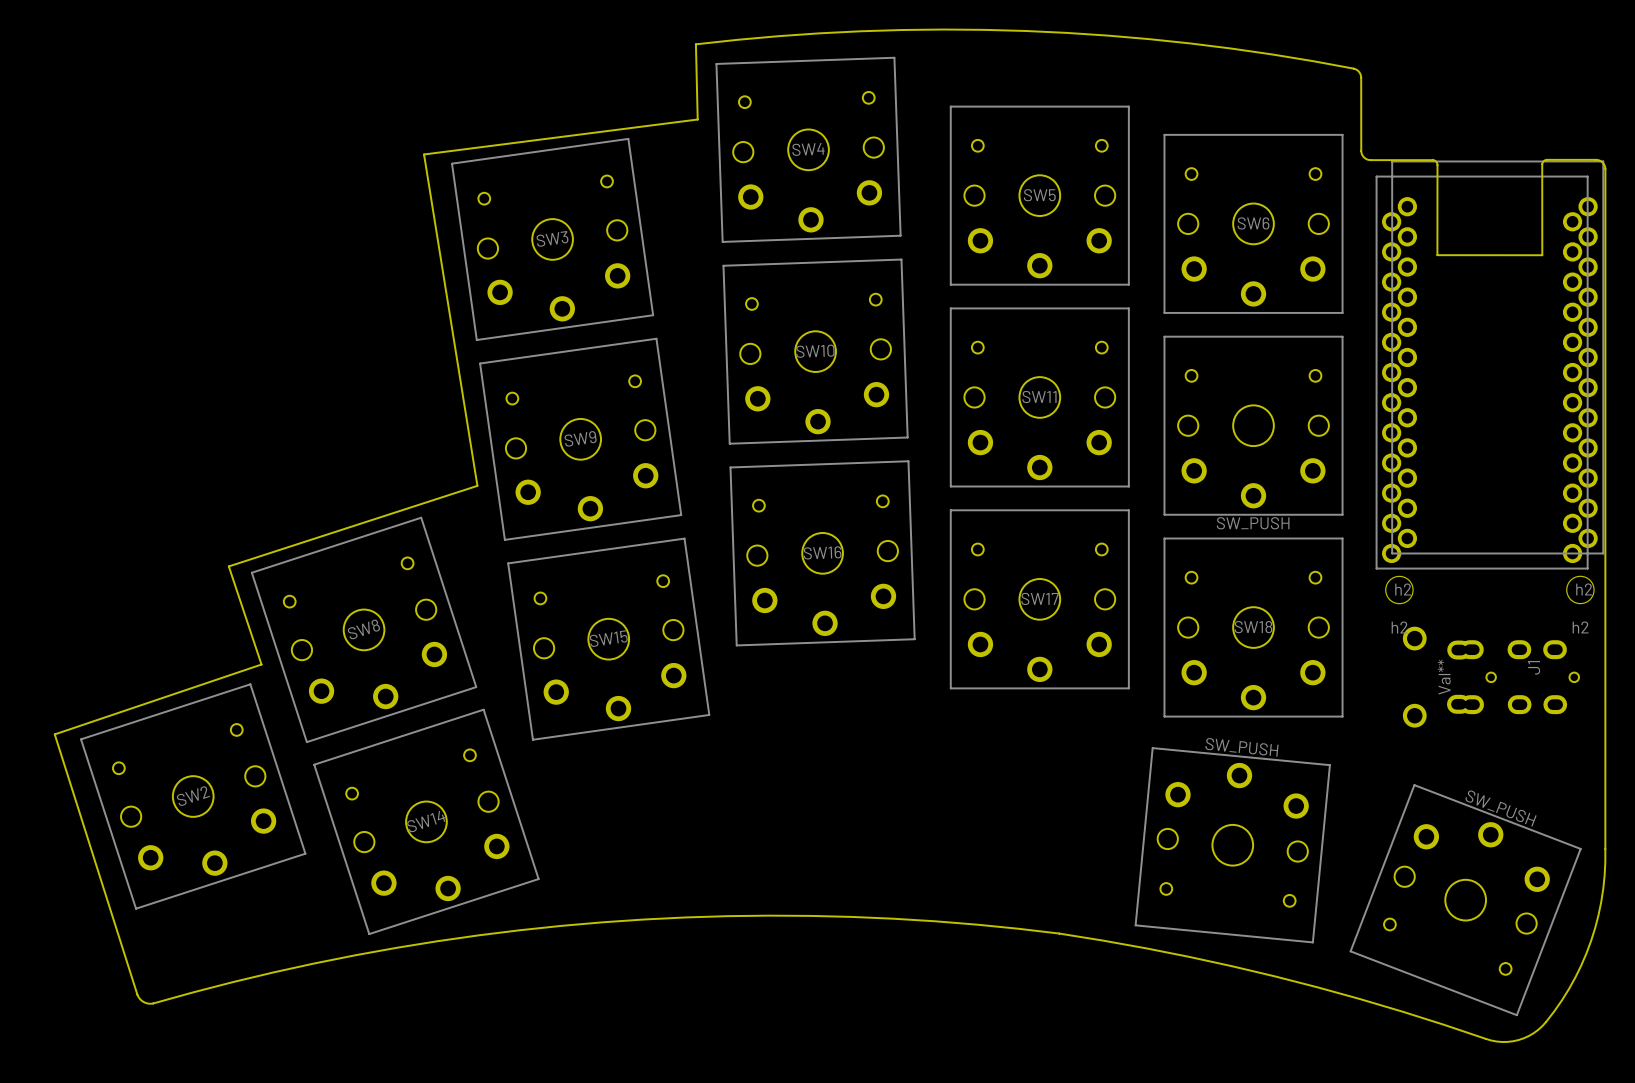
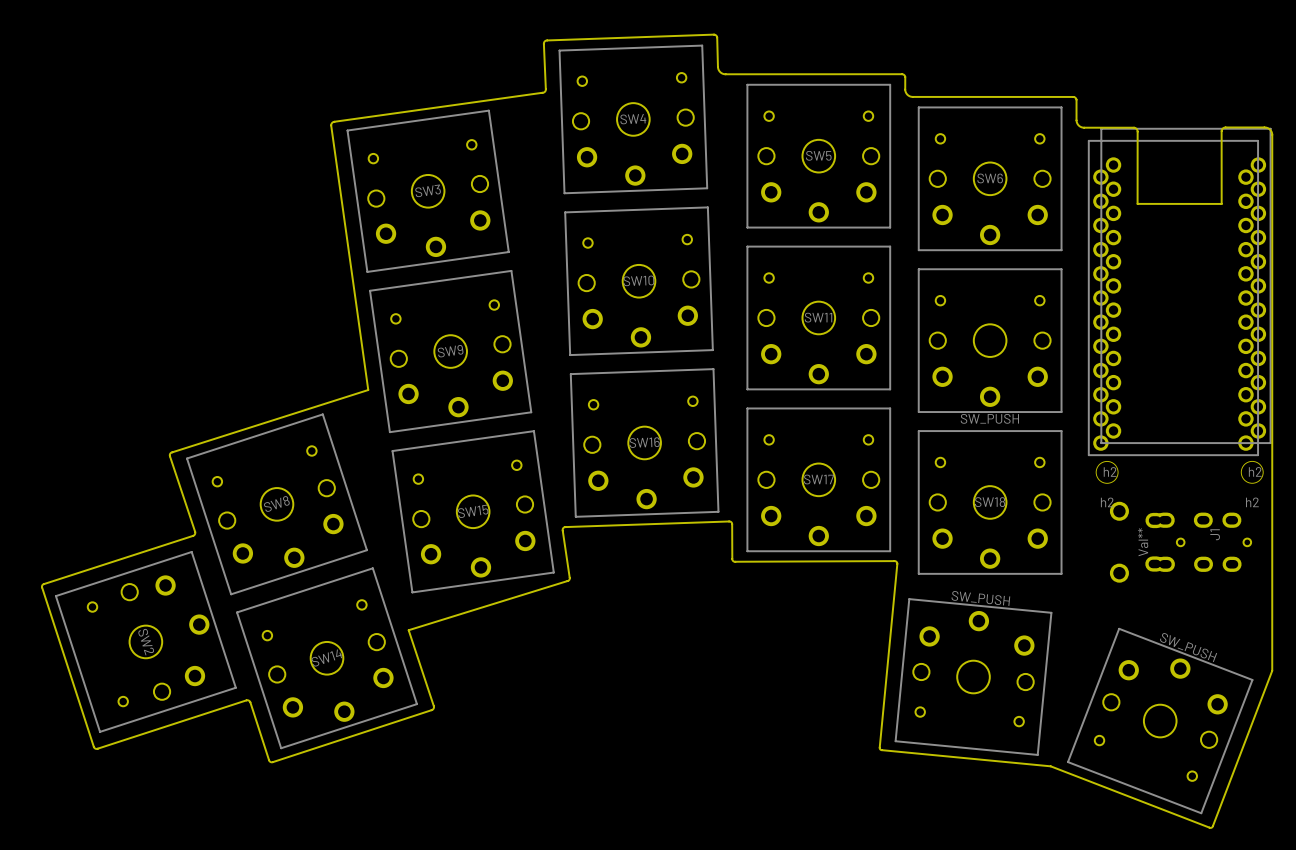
board edge: (1361, 151) (1361, 77) (1359, 72) (1354, 68) (1272, 54) (1149, 39) (1067, 32) (943, 29) (819, 33) (695, 44) (697, 119) (424, 154) (477, 485) (228, 566) (261, 664) (54, 734) (137, 994) (143, 1002) (153, 1003) (233, 981) (314, 963) (396, 947) (519, 930) (602, 922) (685, 917) (768, 915) (852, 916) (935, 921) (1018, 928) (1146, 948) (1232, 966) (1317, 987) (1402, 1011) (1491, 1040) (1507, 1041) (1529, 1035) (1542, 1026) (1561, 1000) (1581, 965) (1591, 940) (1601, 902) (1604, 875) (1605, 837) -> (894, 561) (897, 563) (879, 747) (881, 750) (1050, 766) (1211, 827) (1272, 670)
board edge: none -> (1076, 120) (1076, 99) (1074, 97) (911, 96) (905, 92) (905, 76) (902, 74) (723, 74) (718, 68) (717, 37) (714, 34) (546, 40) (543, 43) (545, 89) (543, 92) (333, 122) (331, 125) (368, 390) (171, 452) (169, 455) (195, 531) (194, 534) (43, 584) (41, 586) (94, 748) (247, 700) (250, 702) (269, 760) (272, 762) (432, 709) (433, 706) (408, 630) (568, 580) (562, 530)
board edge: none -> (562, 530) (565, 527) (729, 521) (732, 523) (732, 559) (734, 561) (894, 561)
SW2 rotation: 0° (193, 796) -> 90° counterclockwise (145, 641)

